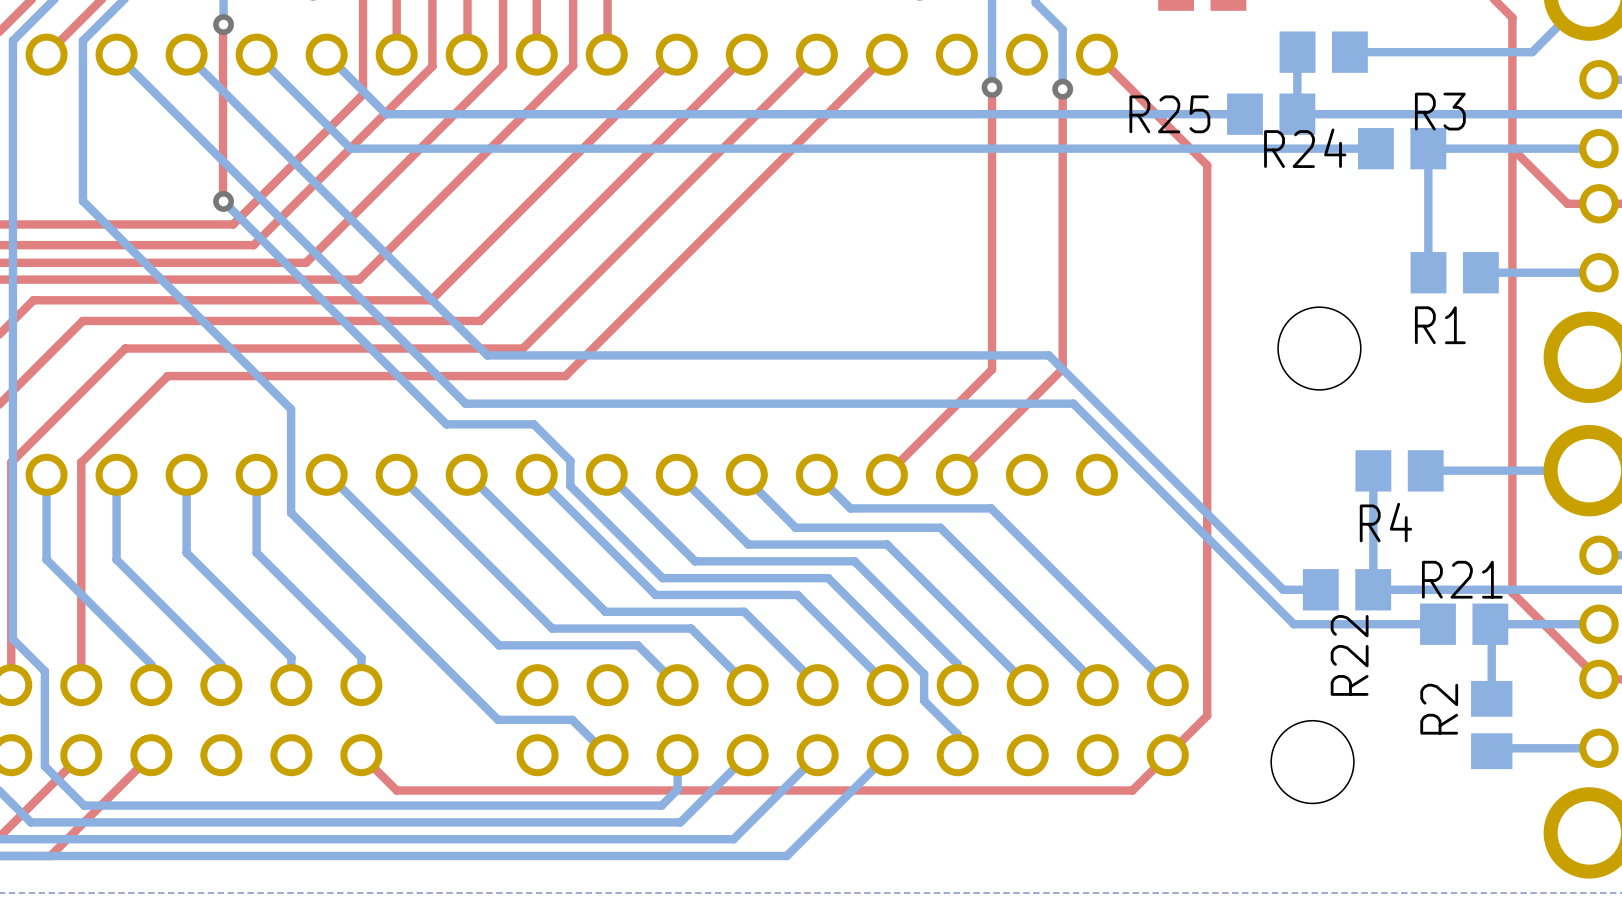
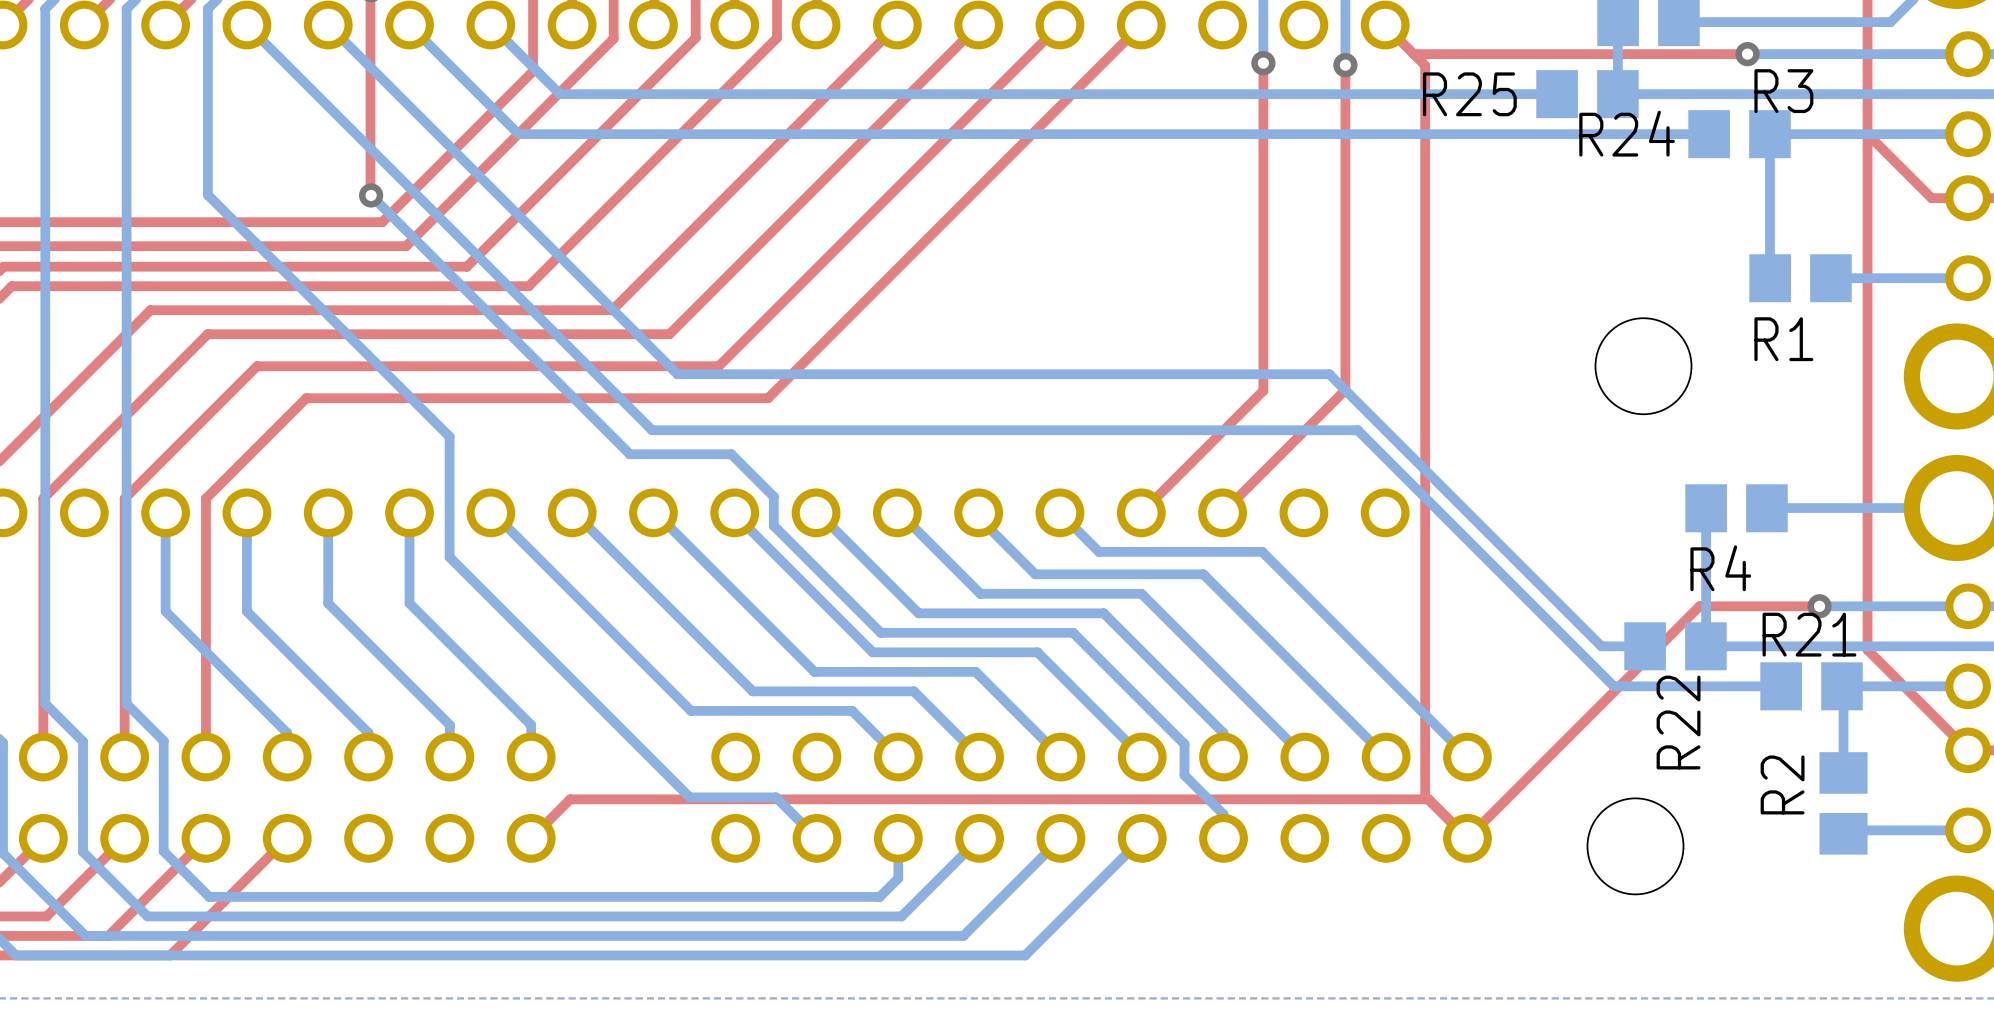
top track: none -> (1747, 54) (1413, 54)
via: none -> (1747, 54)
bottom track: none -> (1968, 54) (1747, 54)
top track: (1131, 89) (1207, 165) (1207, 715) -> (1425, 65) (1425, 796) (1467, 838)
top track: none -> (1819, 606) (1699, 606) (1513, 792)
via: none -> (1819, 606)
bottom track: none -> (1968, 606) (1819, 606)
top track: (1167, 755) (1132, 790) (396, 790) (361, 755) -> (1428, 799) (570, 799) (531, 838)

